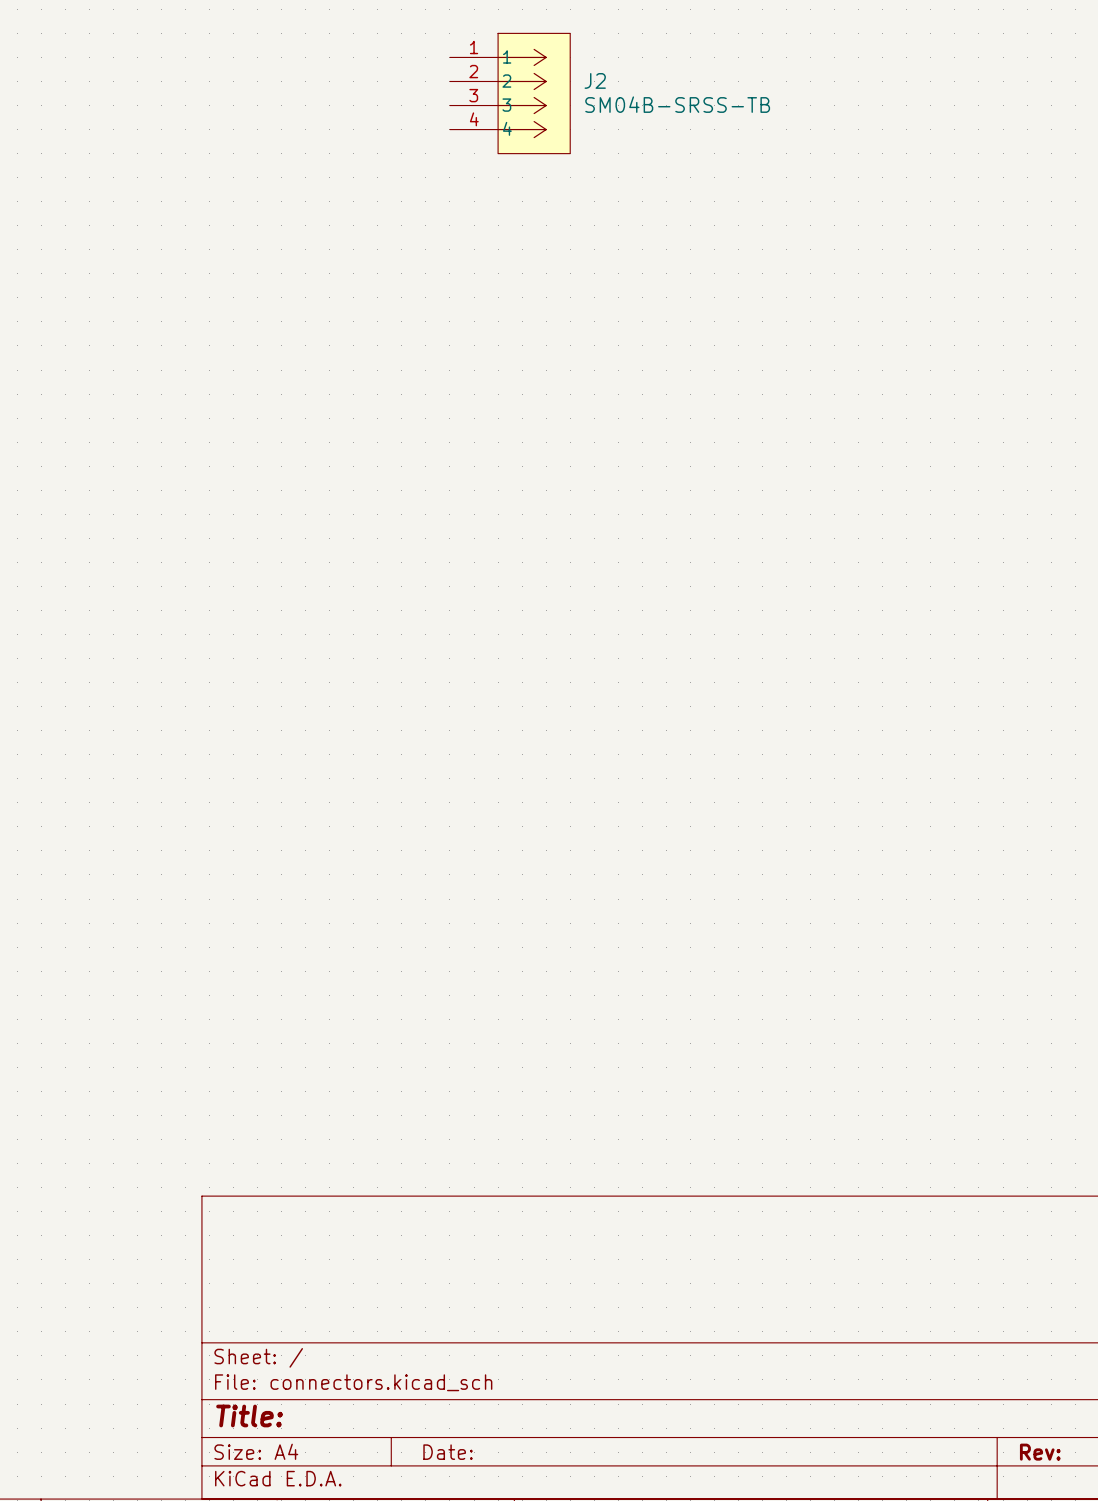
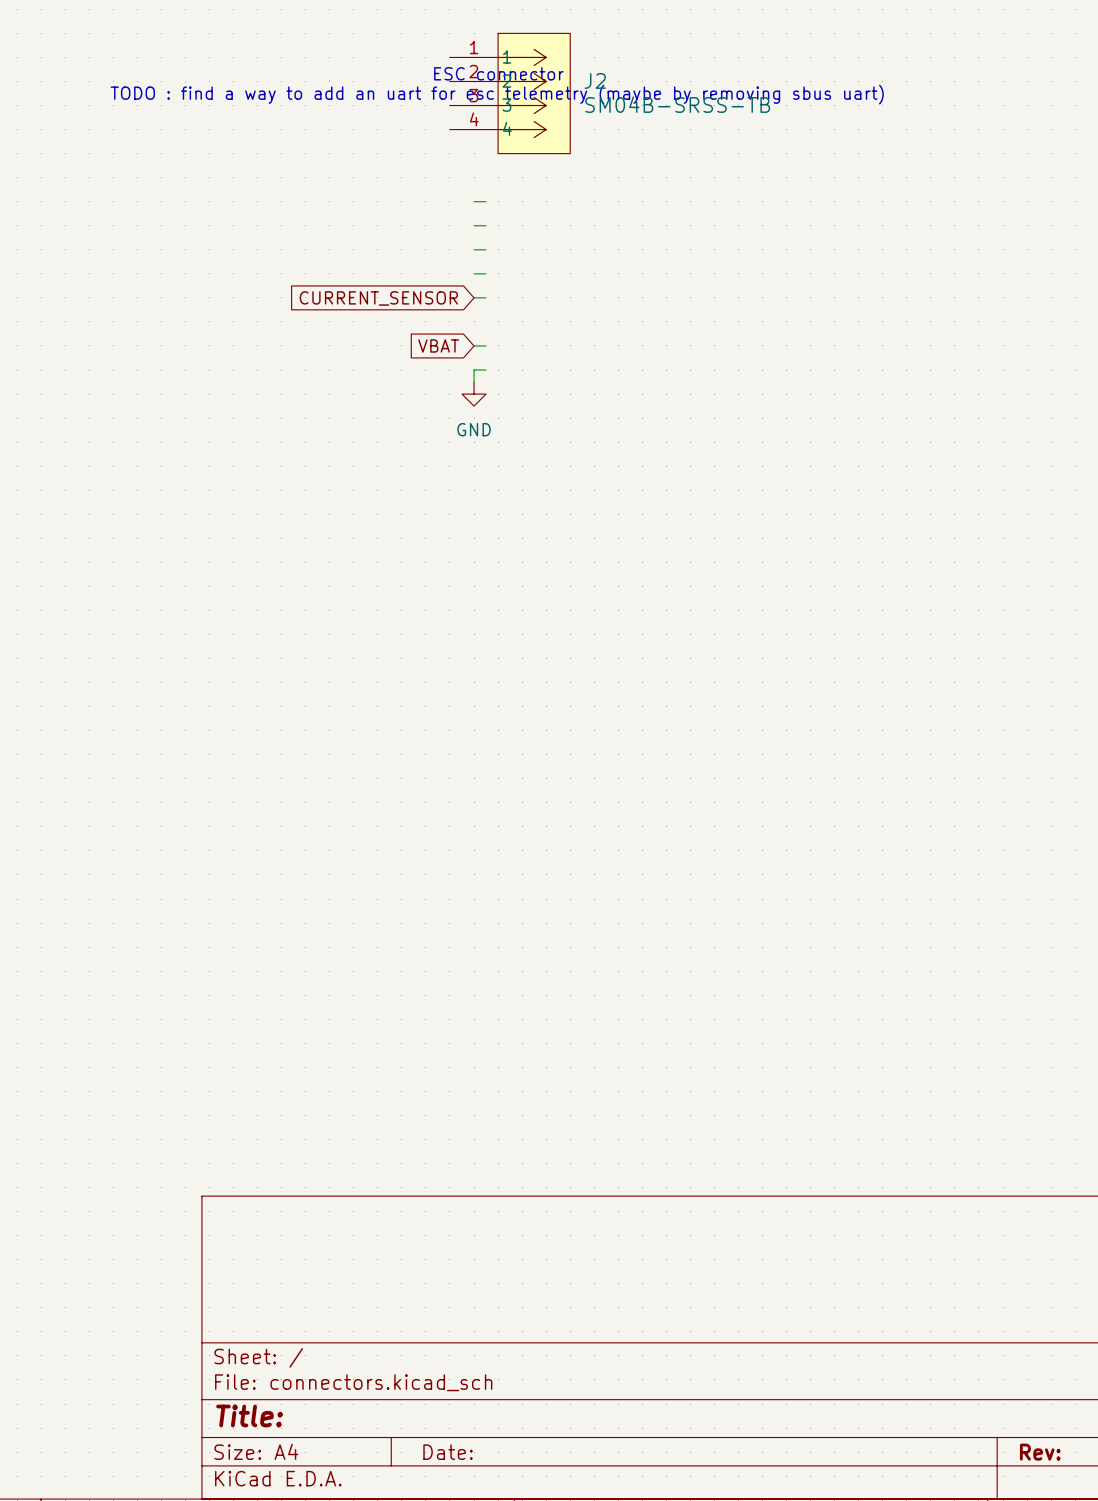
text: none -> ESC connector (498, 73)
text: none -> TODO : find a way to add an uart for esc telemetry (maybe by removing sbus uart) (497, 94)
wire: none -> (474, 201) (486, 201)
wire: none -> (474, 225) (486, 225)
wire: none -> (474, 249) (486, 249)
wire: none -> (474, 273) (486, 273)
wire: none -> (474, 297) (486, 297)
global label: none -> CURRENT_SENSOR (378, 298)
global label: none -> VBAT (438, 345)
wire: none -> (474, 345) (486, 345)
wire: none -> (486, 370) (474, 370) (474, 382)
power symbol: none -> GND (474, 394)

